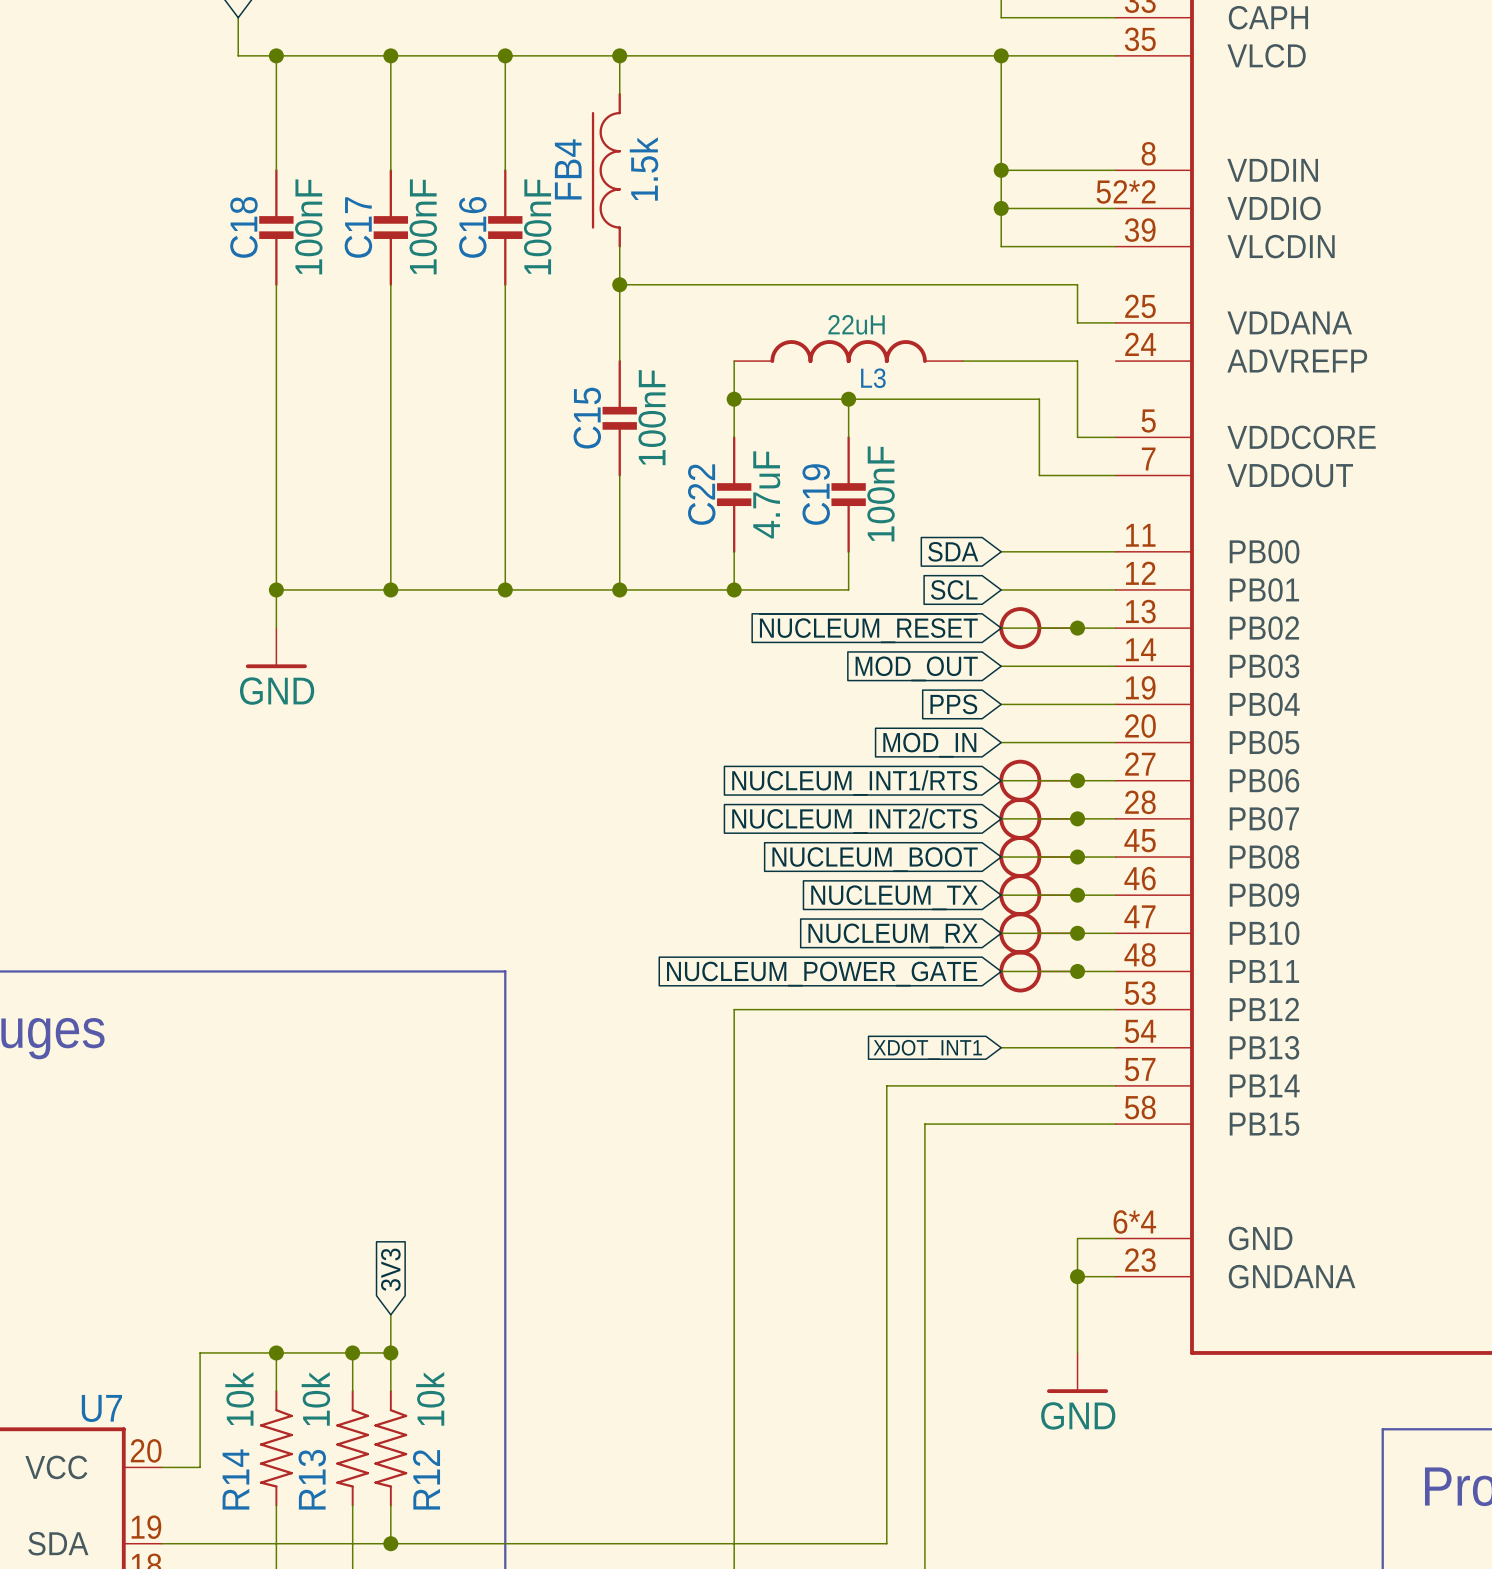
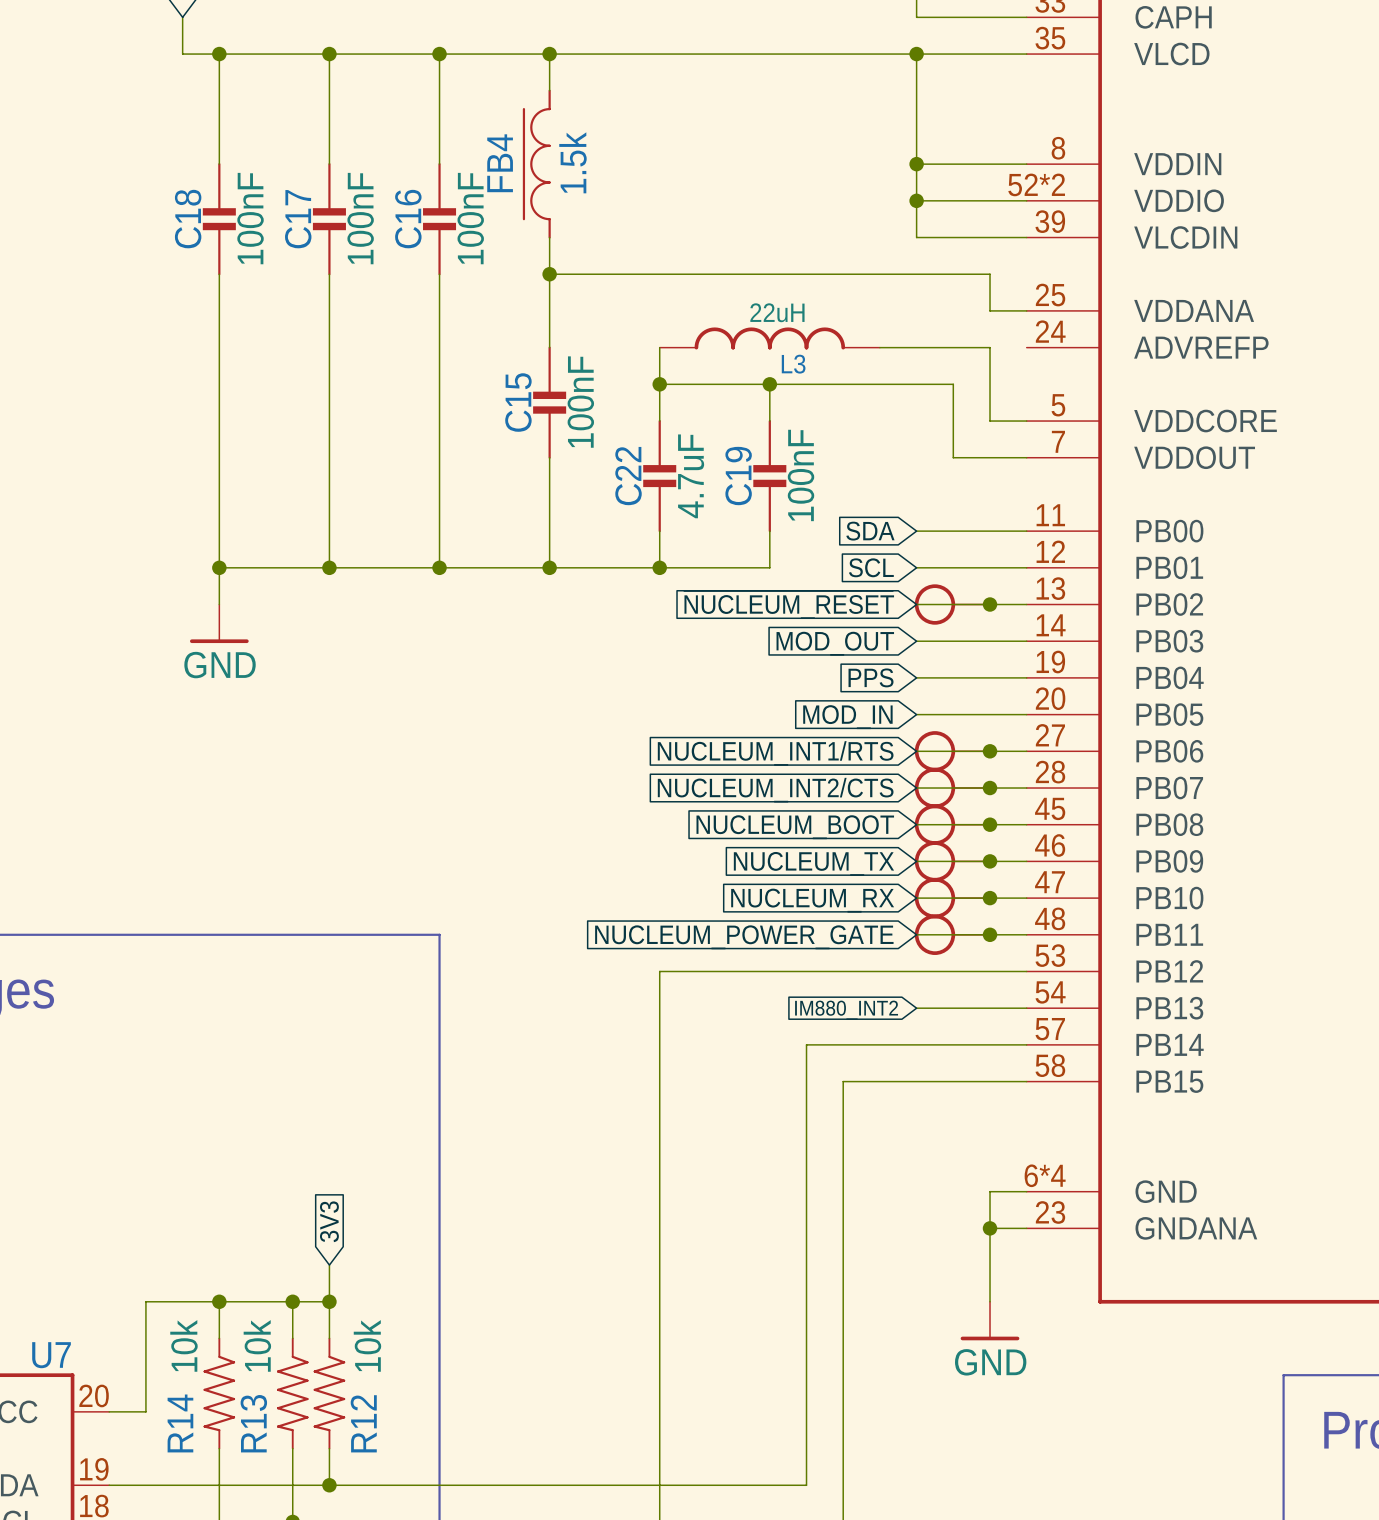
global label: XDOT_INT1 (927, 1049) -> IM880_INT2 (846, 1010)

